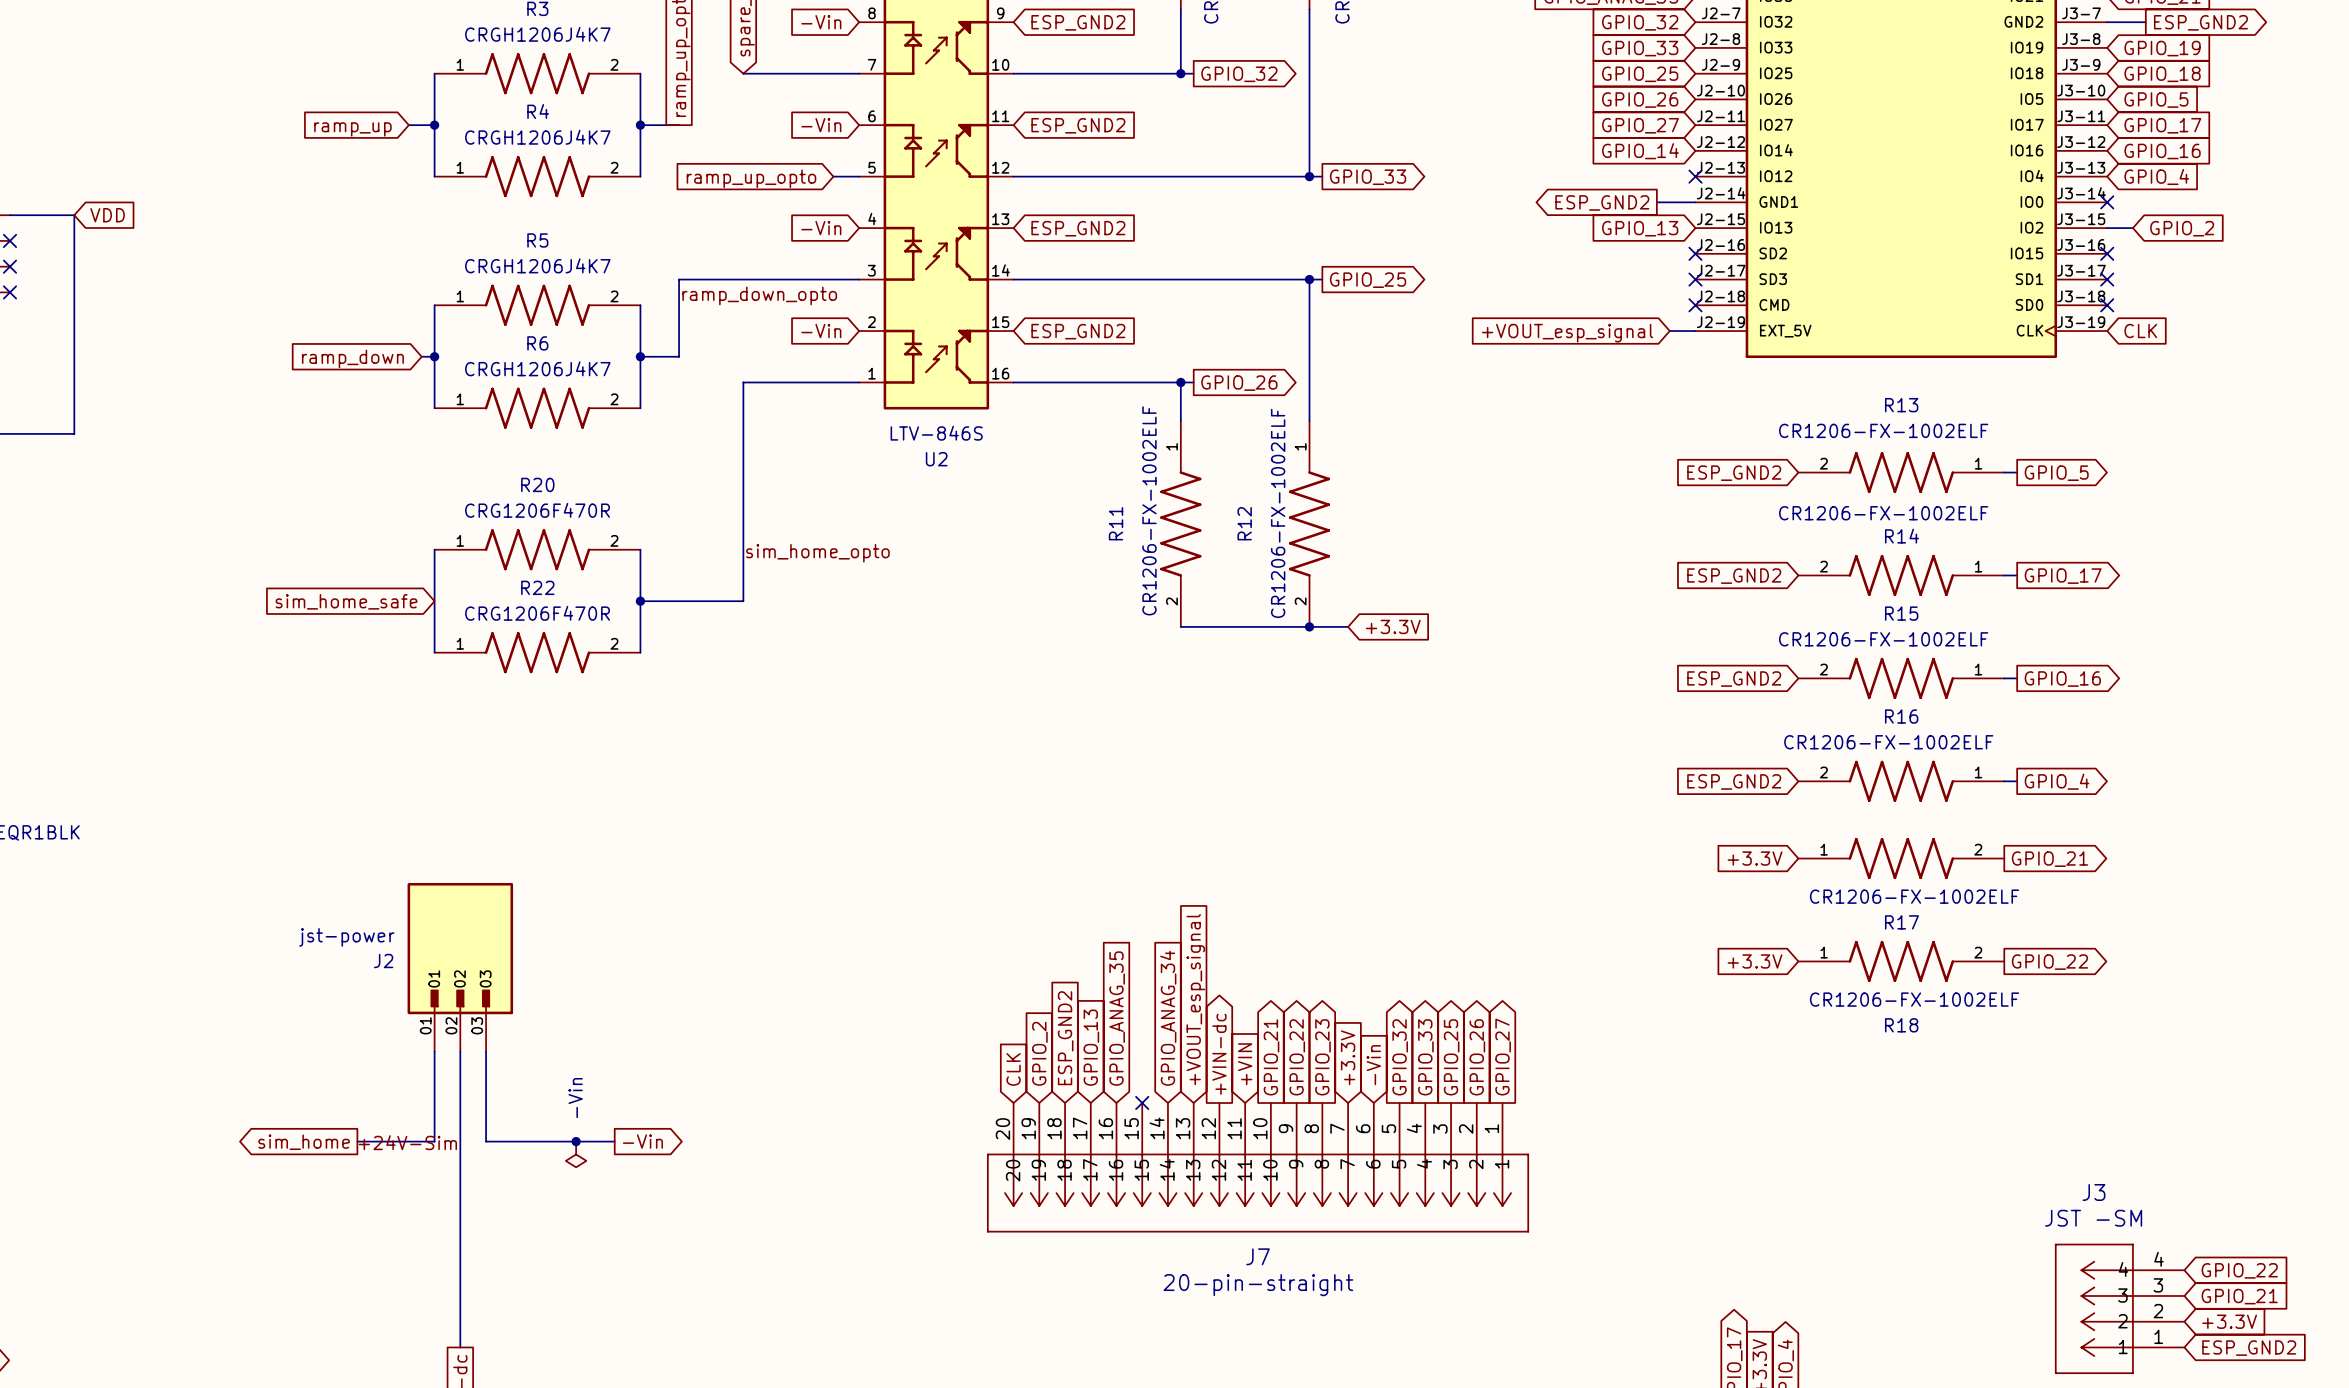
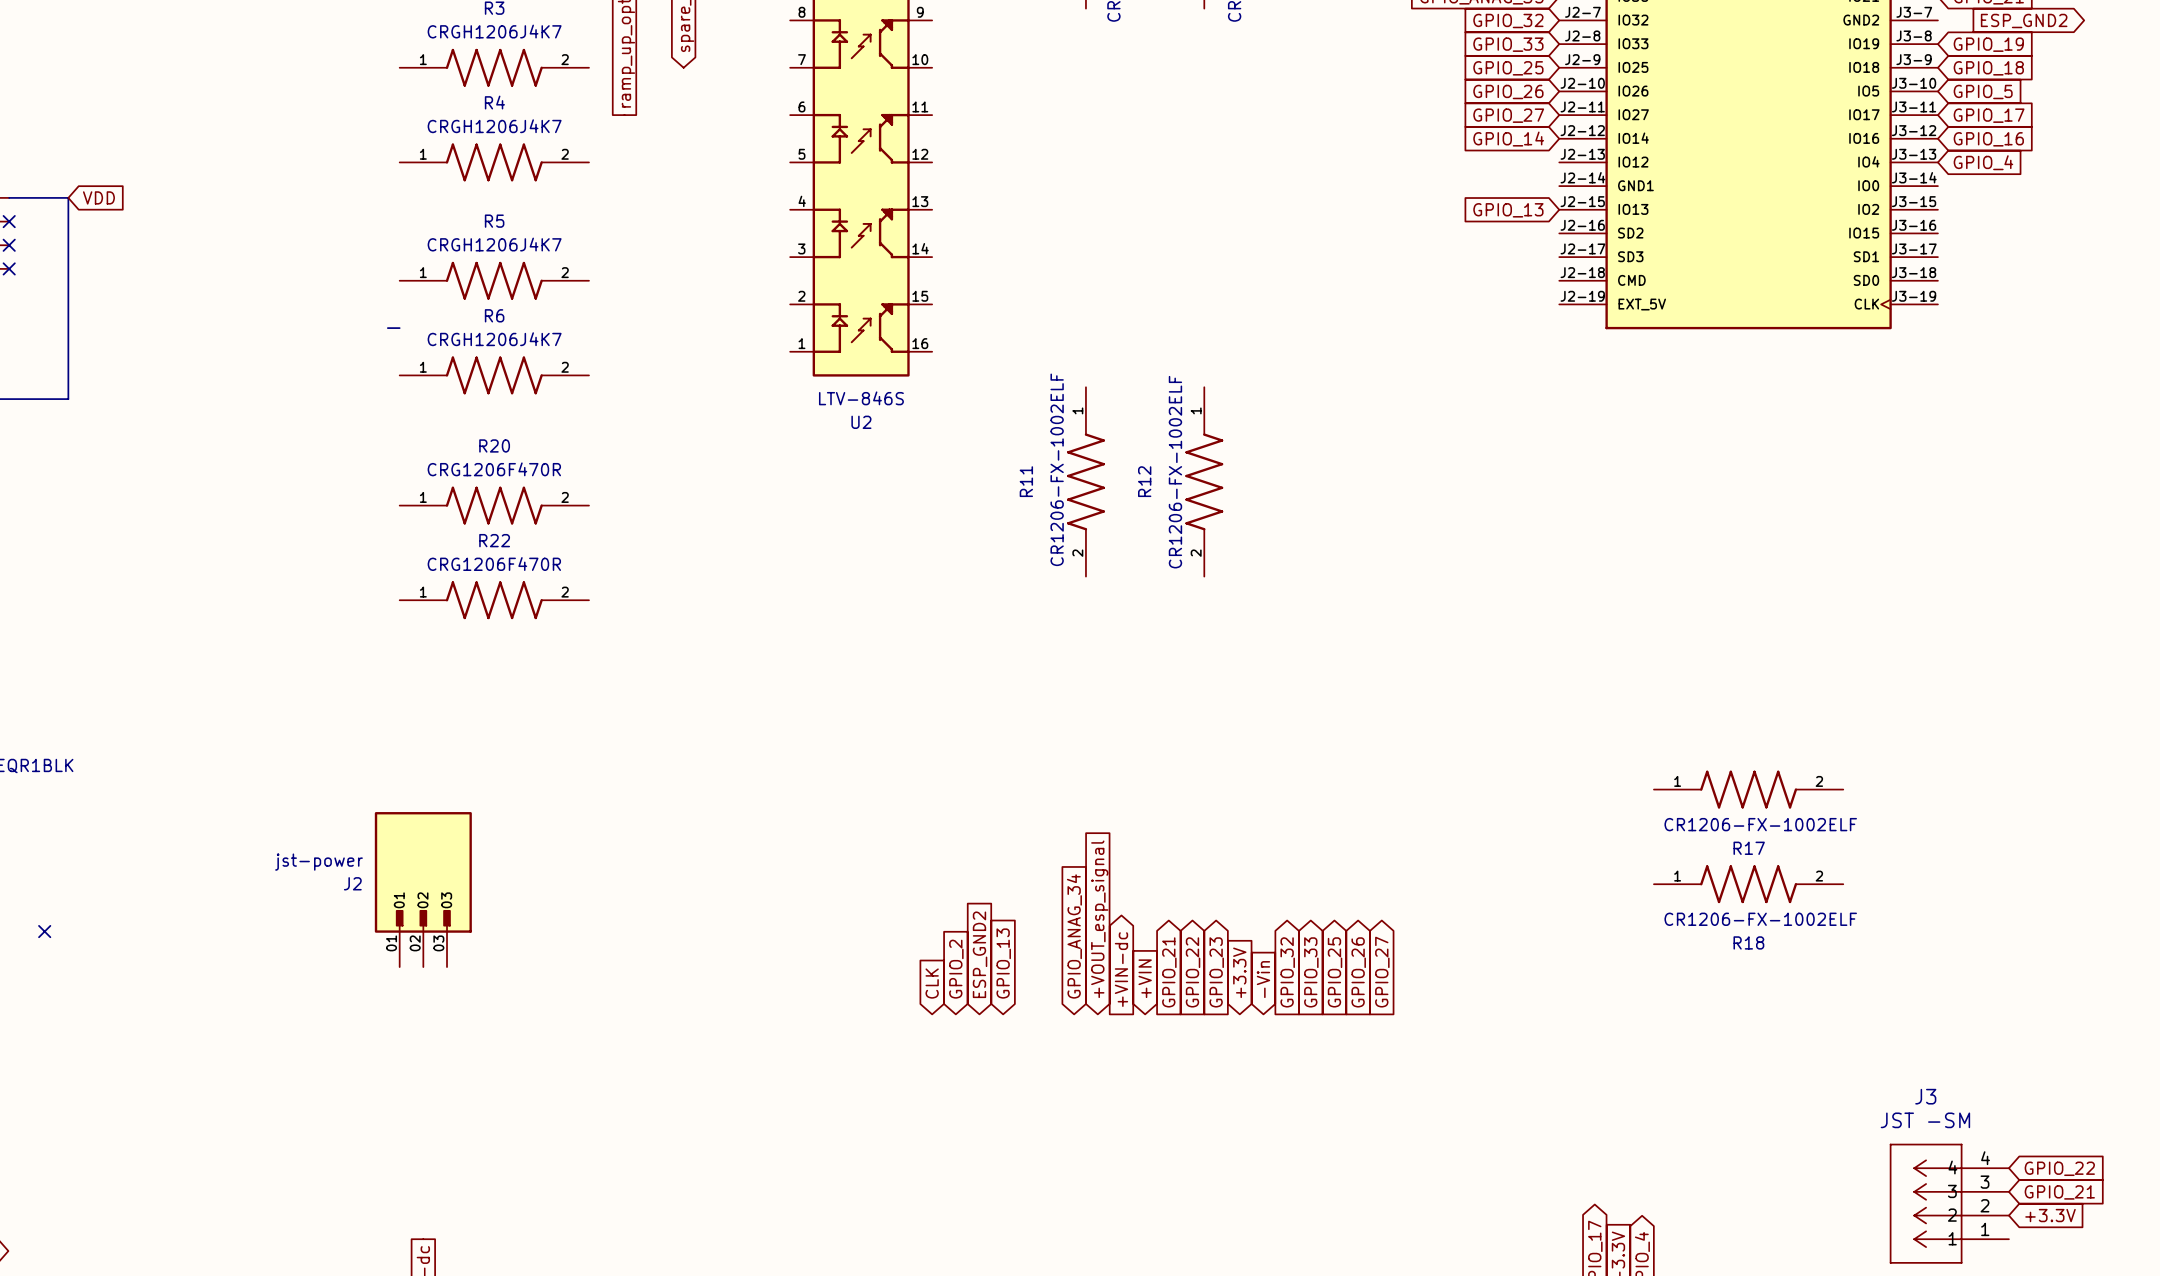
wire: (1180, 9) (1180, 73) -> none
wire: (1309, 9) (1309, 176) -> none
global label: -Vin (821, 22) -> none
global label: ESP_GND2 (1078, 22) -> none
wire: (2107, 22) (2145, 22) -> none
wire: (434, 73) (434, 176) -> none
wire: (640, 73) (640, 176) -> none
wire: (743, 73) (859, 73) -> none
wire: (1013, 73) (1193, 73) -> none
junction: (1180, 73) -> none
global label: GPIO_32 (1239, 74) -> none
wire: (408, 125) (434, 125) -> none
junction: (434, 125) -> none
wire: (640, 125) (679, 125) -> none
junction: (640, 125) -> none
global label: -Vin (821, 125) -> none
global label: ESP_GND2 (1078, 125) -> none
global label: ramp_up (352, 129) -> none
wire: (833, 176) (859, 176) -> none
wire: (1013, 176) (1322, 176) -> none
junction: (1309, 176) -> none
no-connect mark: (1695, 176) -> none
global label: GPIO_33 (1368, 177) -> none
global label: ramp_up_opto (751, 178) -> none
global label: ESP_GND2 (1602, 202) -> none
wire: (1656, 202) (1695, 202) -> none
no-connect mark: (2107, 202) -> none
global label: -Vin (821, 228) -> none
global label: ESP_GND2 (1078, 228) -> none
wire: (2107, 228) (2132, 228) -> none
global label: GPIO_2 (2182, 228) -> none
no-connect mark: (1695, 253) -> none
no-connect mark: (2107, 253) -> none
wire: (859, 279) (679, 279) (679, 356) (640, 356) -> none
wire: (1013, 279) (1322, 279) -> none
wire: (1309, 279) (1309, 421) -> none
junction: (1309, 279) -> none
no-connect mark: (1695, 279) -> none
no-connect mark: (2107, 279) -> none
global label: GPIO_25 (1368, 280) -> none
label: ramp_down_opto (759, 295) -> none
wire: (434, 305) (434, 408) -> none
wire: (640, 305) (640, 408) -> none
no-connect mark: (1695, 305) -> none
no-connect mark: (2107, 305) -> none
global label: -Vin (821, 331) -> none
global label: ESP_GND2 (1078, 331) -> none
wire: (1669, 331) (1695, 331) -> none
global label: CLK (2140, 331) -> none
global label: +VOUT_esp_signal (1567, 333) -> none
junction: (434, 356) -> none
junction: (640, 356) -> none
global label: ramp_down (352, 358) -> none
wire: (859, 382) (743, 382) (743, 601) (640, 601) -> none
wire: (1013, 382) (1193, 382) -> none
wire: (1180, 382) (1180, 421) -> none
junction: (1180, 382) -> none
global label: GPIO_26 (1239, 383) -> none
R14: CR1206-FX-1002ELF (1901, 472) -> none
wire: (2004, 472) (2017, 472) -> none
global label: ESP_GND2 (1734, 473) -> none
global label: GPIO_5 (2056, 473) -> none
wire: (434, 549) (434, 652) -> none
wire: (640, 549) (640, 652) -> none
label: sim_home_opto (817, 553) -> none
R13: CR1206-FX-1002ELF (1901, 575) -> none
wire: (2004, 575) (2017, 575) -> none
global label: ESP_GND2 (1734, 576) -> none
global label: GPIO_17 (2063, 576) -> none
global label: sim_home_safe (346, 601) -> none
junction: (640, 601) -> none
wire: (1180, 626) (1348, 626) -> none
junction: (1309, 626) -> none
global label: +3.3V (1393, 626) -> none
R15: CR1206-FX-1002ELF (1901, 678) -> none
wire: (2004, 678) (2017, 678) -> none
global label: ESP_GND2 (1734, 679) -> none
global label: GPIO_16 (2062, 679) -> none
global label: ESP_GND2 (1734, 781) -> none
R16: CR1206-FX-1002ELF (1901, 781) -> none
wire: (2004, 781) (2017, 781) -> none
global label: GPIO_4 (2056, 781) -> none
global label: +3.3V (1755, 858) -> none
global label: GPIO_21 (2049, 859) -> none
global label: +3.3V (1755, 961) -> none
global label: GPIO_22 (2049, 962) -> none
no-connect mark: none -> (44, 931)
global label: GPIO_ANAG_35 (1117, 1018) -> none
wire: (434, 1051) (434, 1141) (357, 1141) -> none
wire: (460, 1051) (460, 1347) -> none
wire: (486, 1051) (486, 1141) (614, 1141) -> none
no-connect mark: (1142, 1103) -> none
junction: (576, 1141) -> none
global label: -Vin (642, 1141) -> none
global label: sim_home (304, 1142) -> none
label: +24V-Sim (407, 1142) -> none
power symbol: -Vin (576, 1154) -> none
J7: 20-pin-straight (1258, 1167) -> none
global label: ESP_GND2 (2249, 1348) -> none

